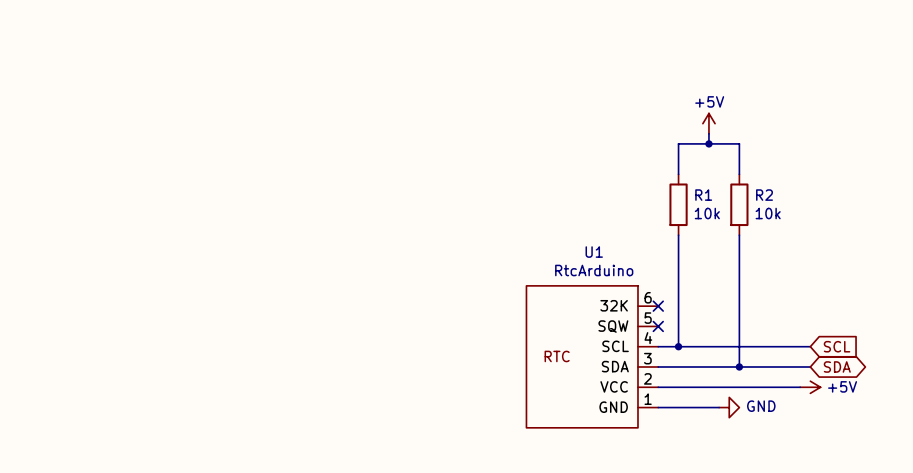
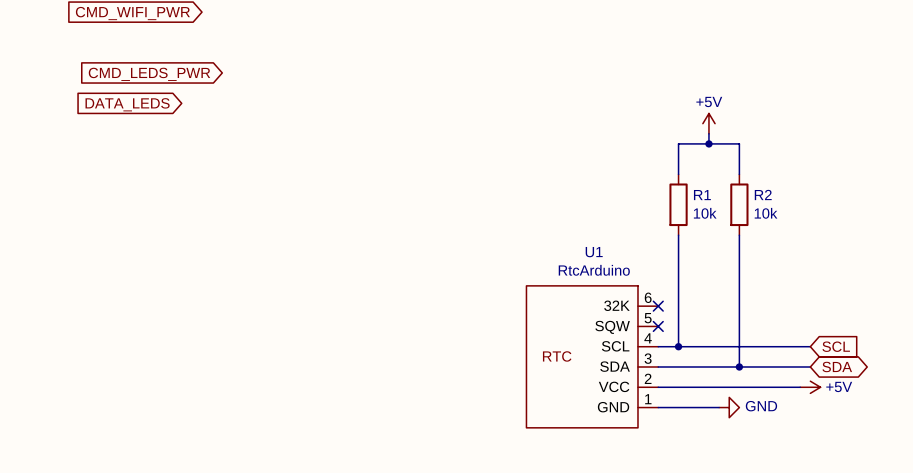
global label: none -> CMD_WIFI_PWR (132, 13)
global label: none -> CMD_LEDS_PWR (149, 74)
global label: none -> DATA_LEDS (127, 104)

